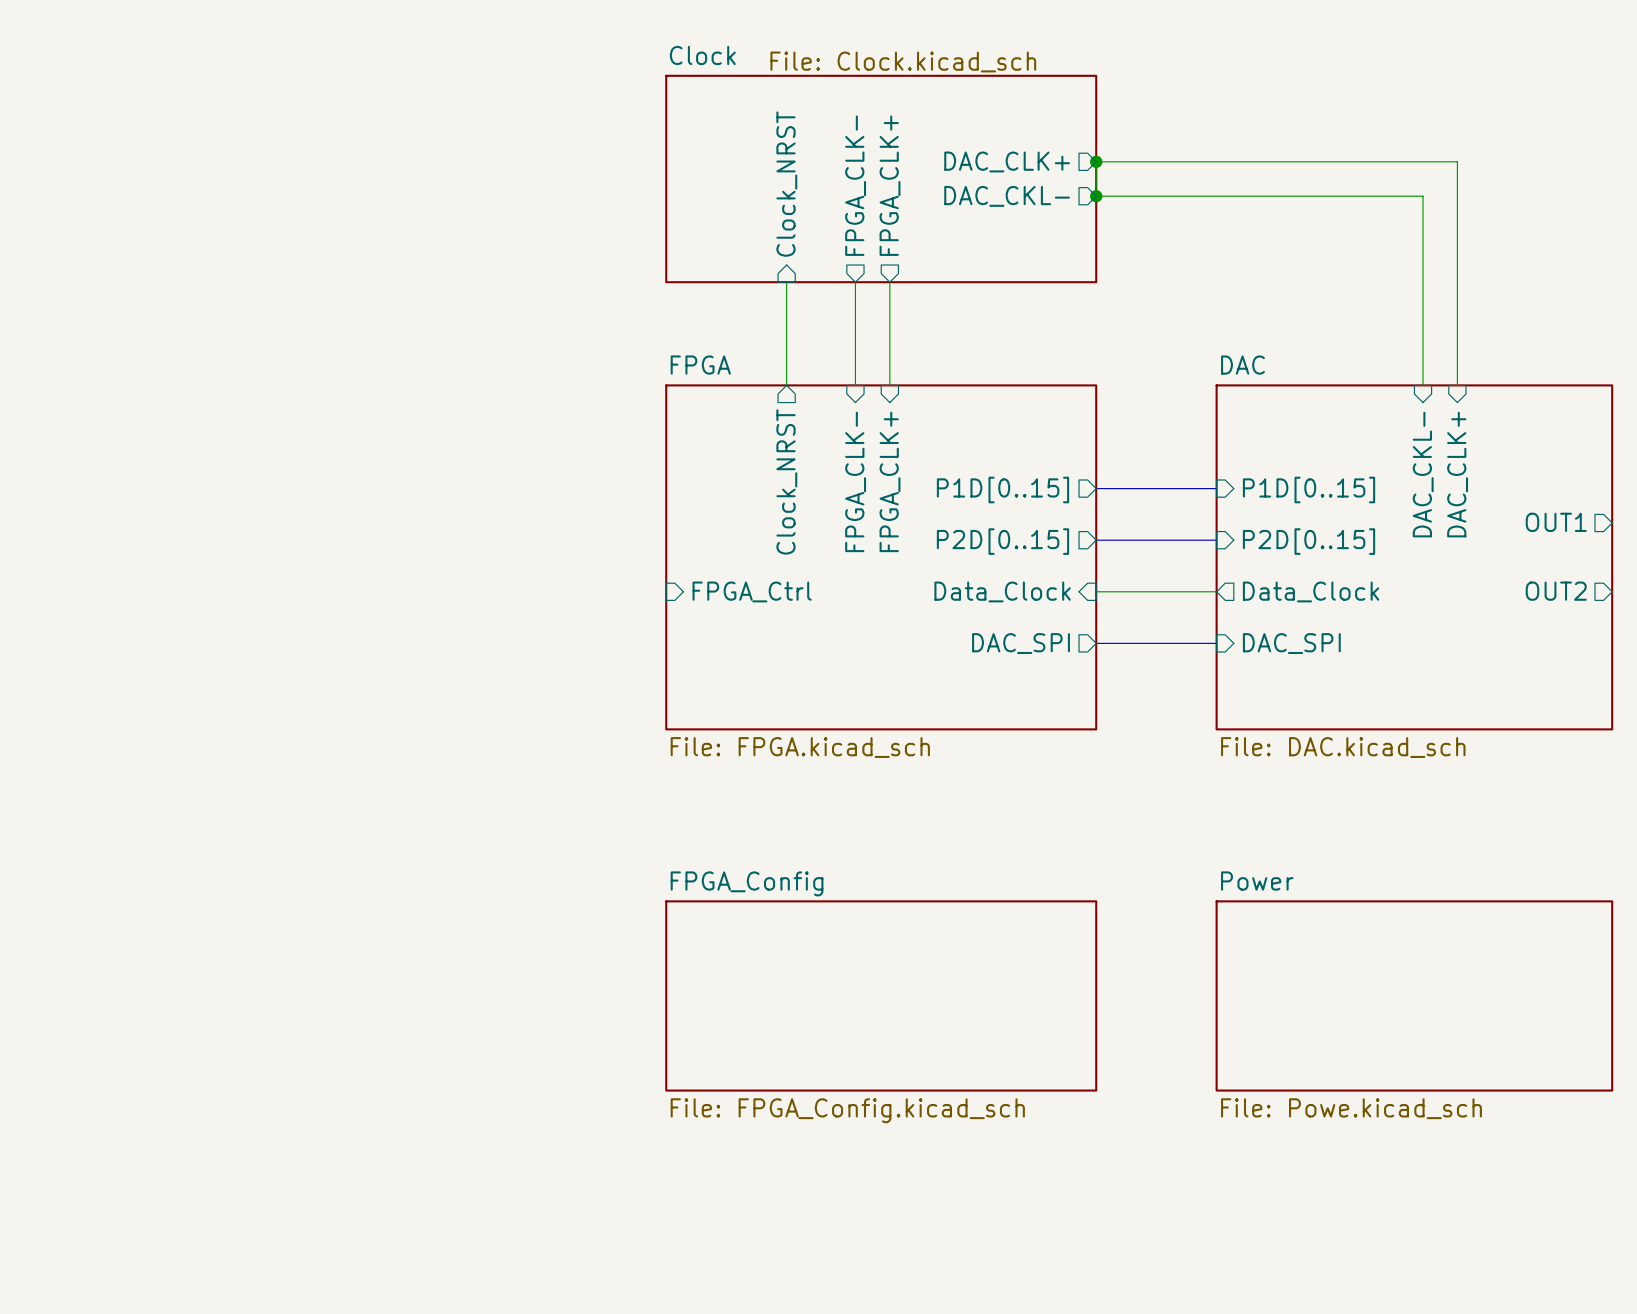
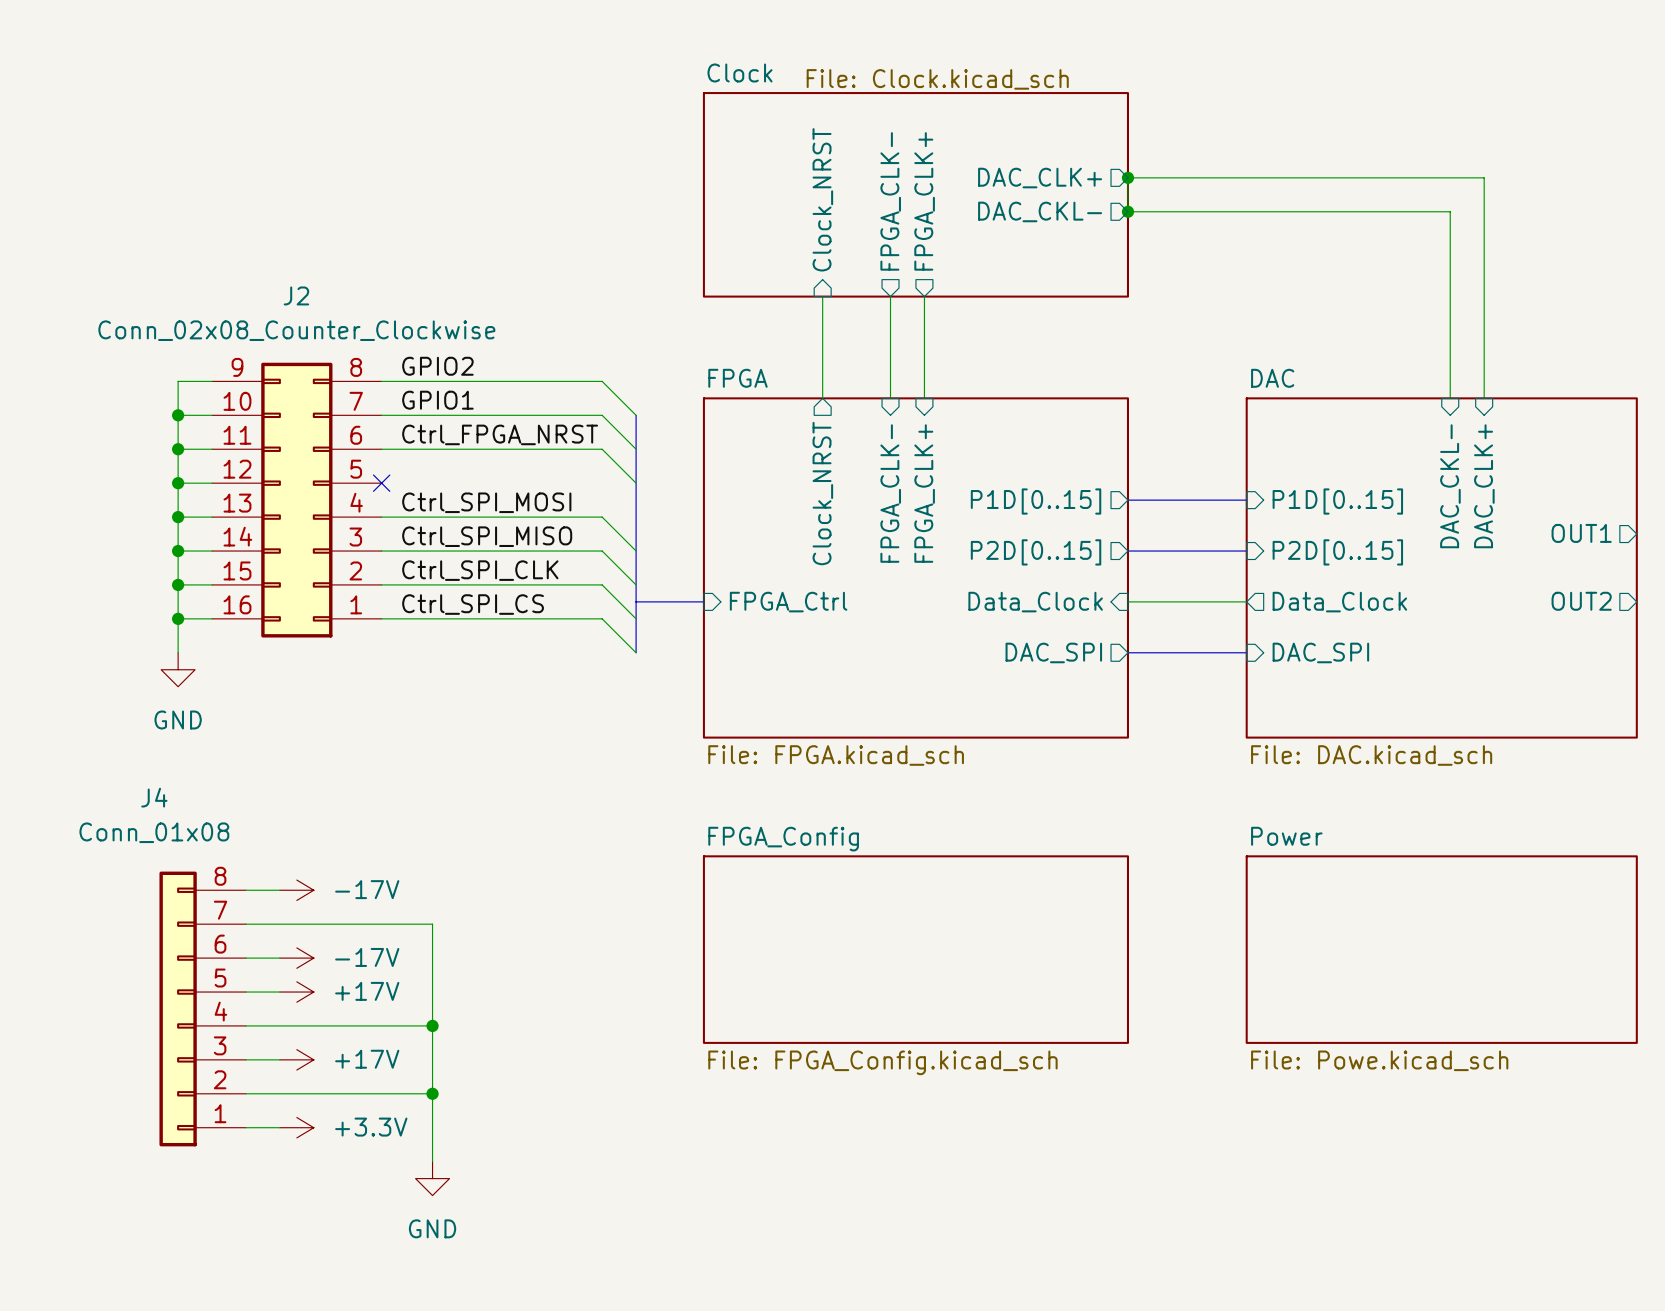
label: none -> GPIO2 (437, 366)
wire: none -> (212, 381) (178, 381) (178, 652)
wire: none -> (381, 381) (602, 381) (636, 415)
label: none -> GPIO1 (437, 400)
wire: none -> (178, 415) (212, 415)
junction: none -> (178, 415)
wire: none -> (381, 415) (602, 415) (636, 449)
bus: none -> (636, 415) (636, 652)
label: none -> Ctrl_FPGA_NRST (500, 434)
wire: none -> (178, 449) (212, 449)
junction: none -> (178, 449)
wire: none -> (381, 449) (602, 449) (636, 483)
wire: none -> (178, 483) (212, 483)
junction: none -> (178, 483)
no-connect mark: none -> (381, 483)
J2: none -> Conn_02x08_Counter_Clockwise (296, 500)
label: none -> Ctrl_SPI_MOSI (486, 502)
wire: none -> (178, 517) (212, 517)
junction: none -> (178, 517)
wire: none -> (381, 517) (602, 517) (636, 551)
label: none -> Ctrl_SPI_MISO (487, 536)
wire: none -> (178, 551) (212, 551)
junction: none -> (178, 551)
wire: none -> (381, 551) (602, 551) (636, 584)
label: none -> Ctrl_SPI_CLK (480, 570)
wire: none -> (178, 584) (212, 584)
junction: none -> (178, 584)
wire: none -> (381, 584) (602, 584) (636, 618)
bus: none -> (636, 601) (703, 601)
label: none -> Ctrl_SPI_CS (473, 604)
wire: none -> (178, 618) (212, 618)
junction: none -> (178, 618)
wire: none -> (381, 618) (602, 618) (636, 652)
power symbol: none -> GND (178, 669)
wire: none -> (245, 890) (279, 890)
power symbol: none -> -17V (296, 890)
wire: none -> (245, 924) (432, 924) (432, 1161)
wire: none -> (245, 958) (279, 958)
power symbol: none -> -17V (296, 958)
wire: none -> (245, 992) (279, 992)
power symbol: none -> +17V (296, 992)
sheet FPGA_Config position: (881, 995) -> (915, 949)
sheet Power position: (1414, 995) -> (1441, 949)
J4: none -> Conn_01x08 (202, 1008)
wire: none -> (245, 1025) (432, 1025)
junction: none -> (432, 1025)
wire: none -> (245, 1059) (279, 1059)
power symbol: none -> +17V (296, 1059)
wire: none -> (245, 1093) (432, 1093)
junction: none -> (432, 1093)
wire: none -> (245, 1127) (279, 1127)
power symbol: none -> +3.3V (296, 1127)
power symbol: none -> GND (432, 1178)

